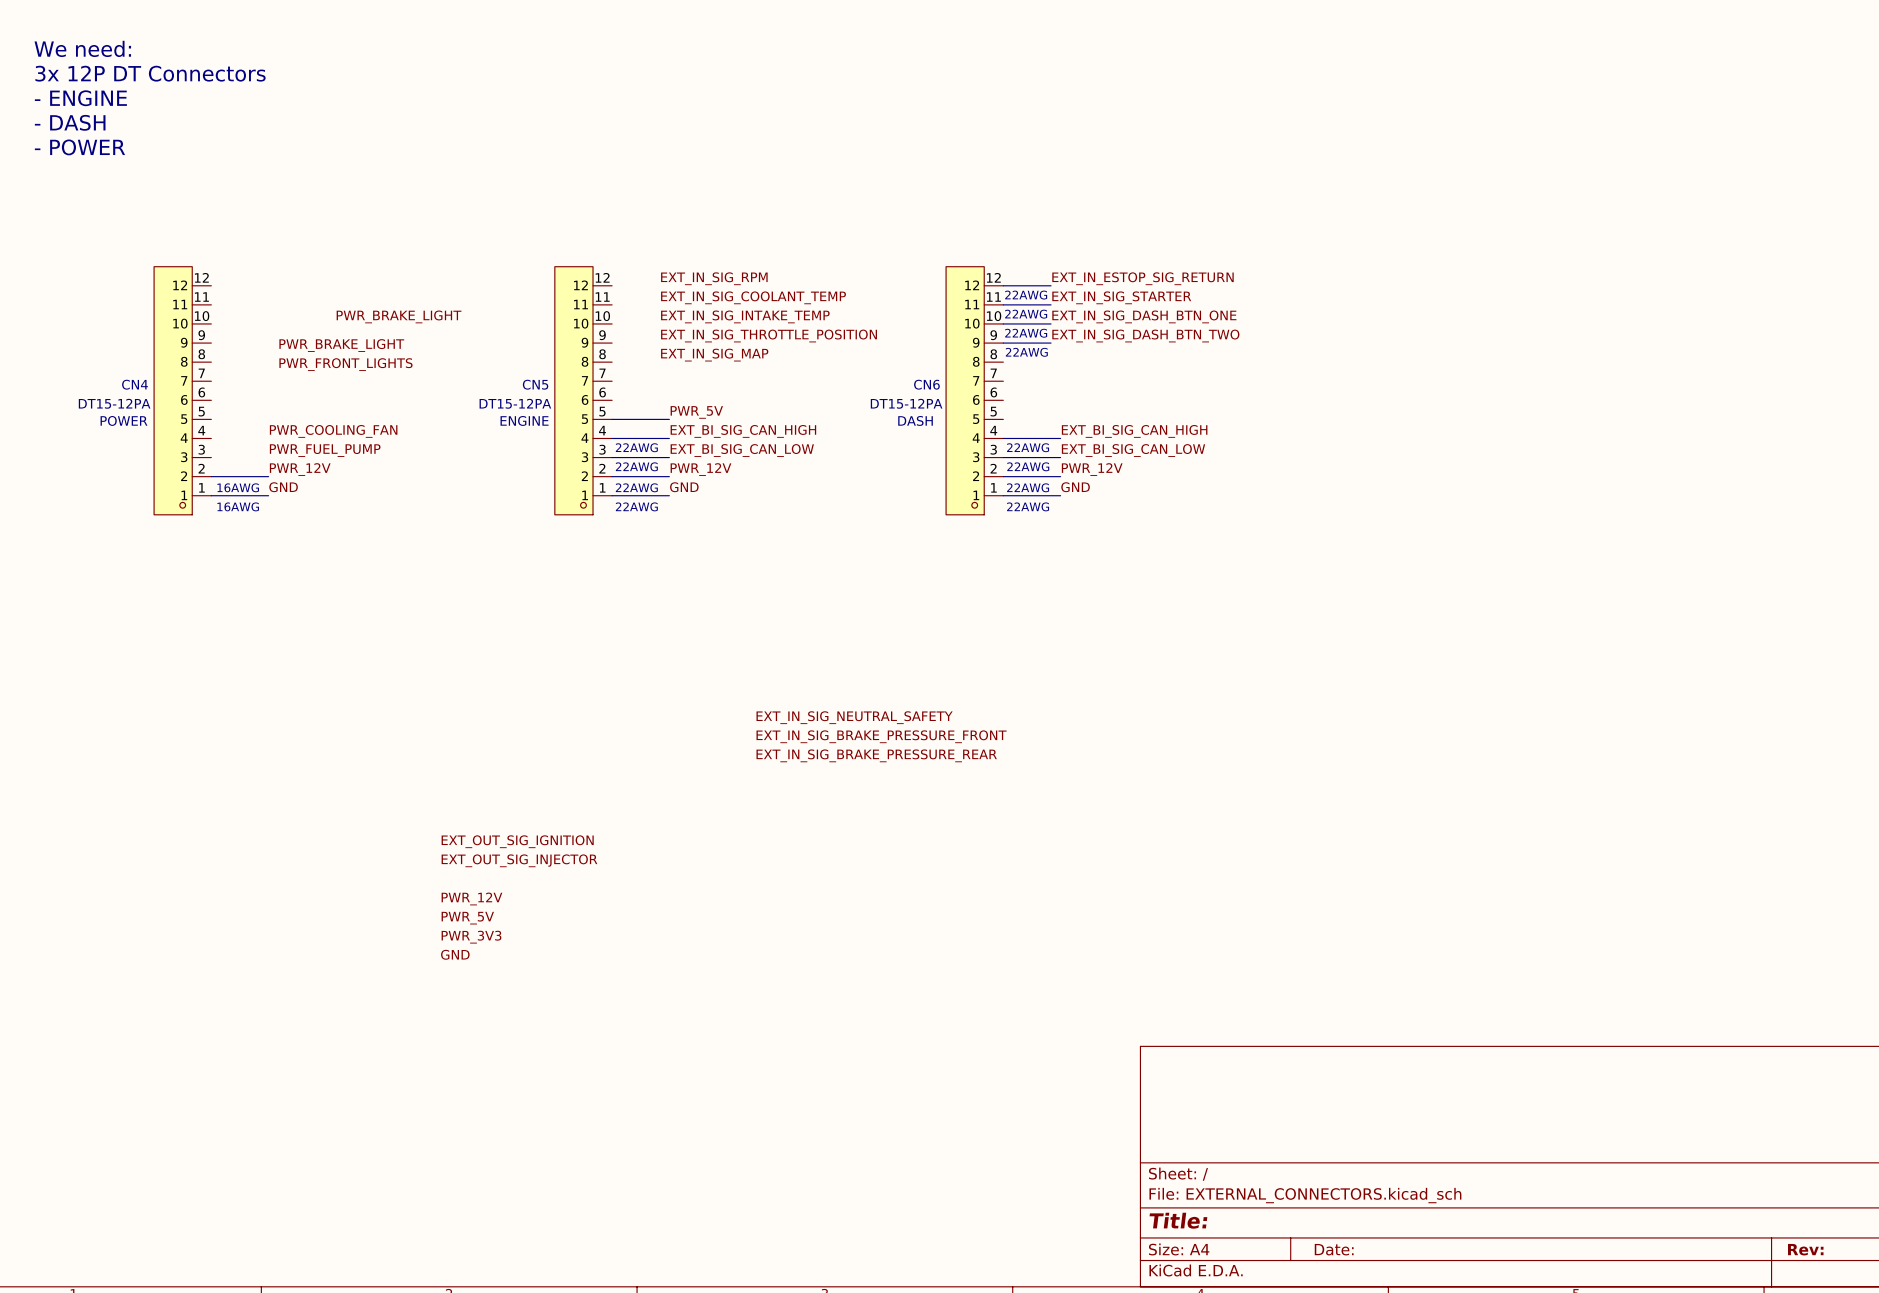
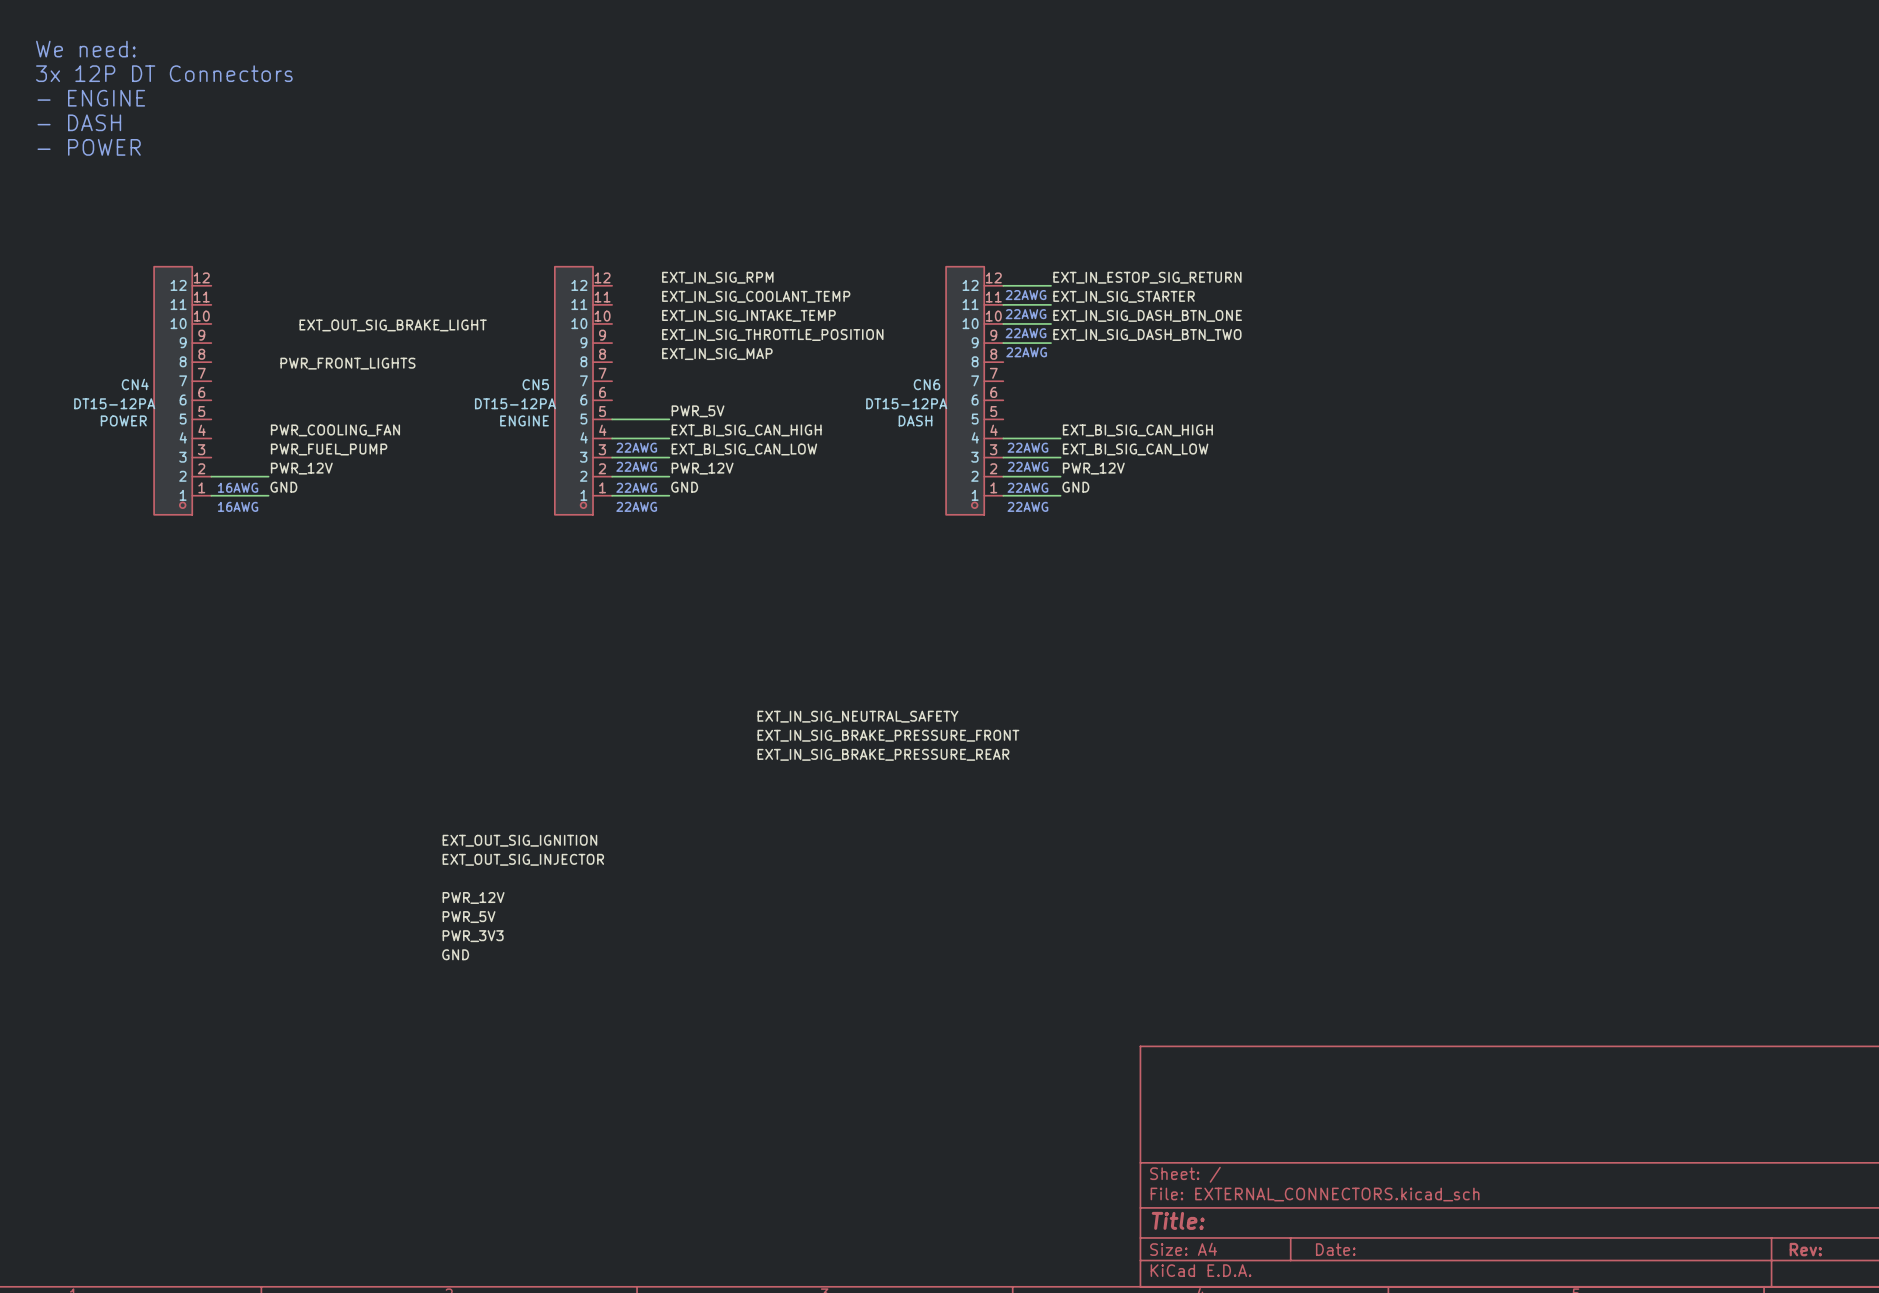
label: PWR_BRAKE_LIGHT (399, 316) -> none
label: none -> EXT_OUT_SIG_BRAKE_LIGHT (393, 325)
label: PWR_BRAKE_LIGHT (341, 345) -> none

